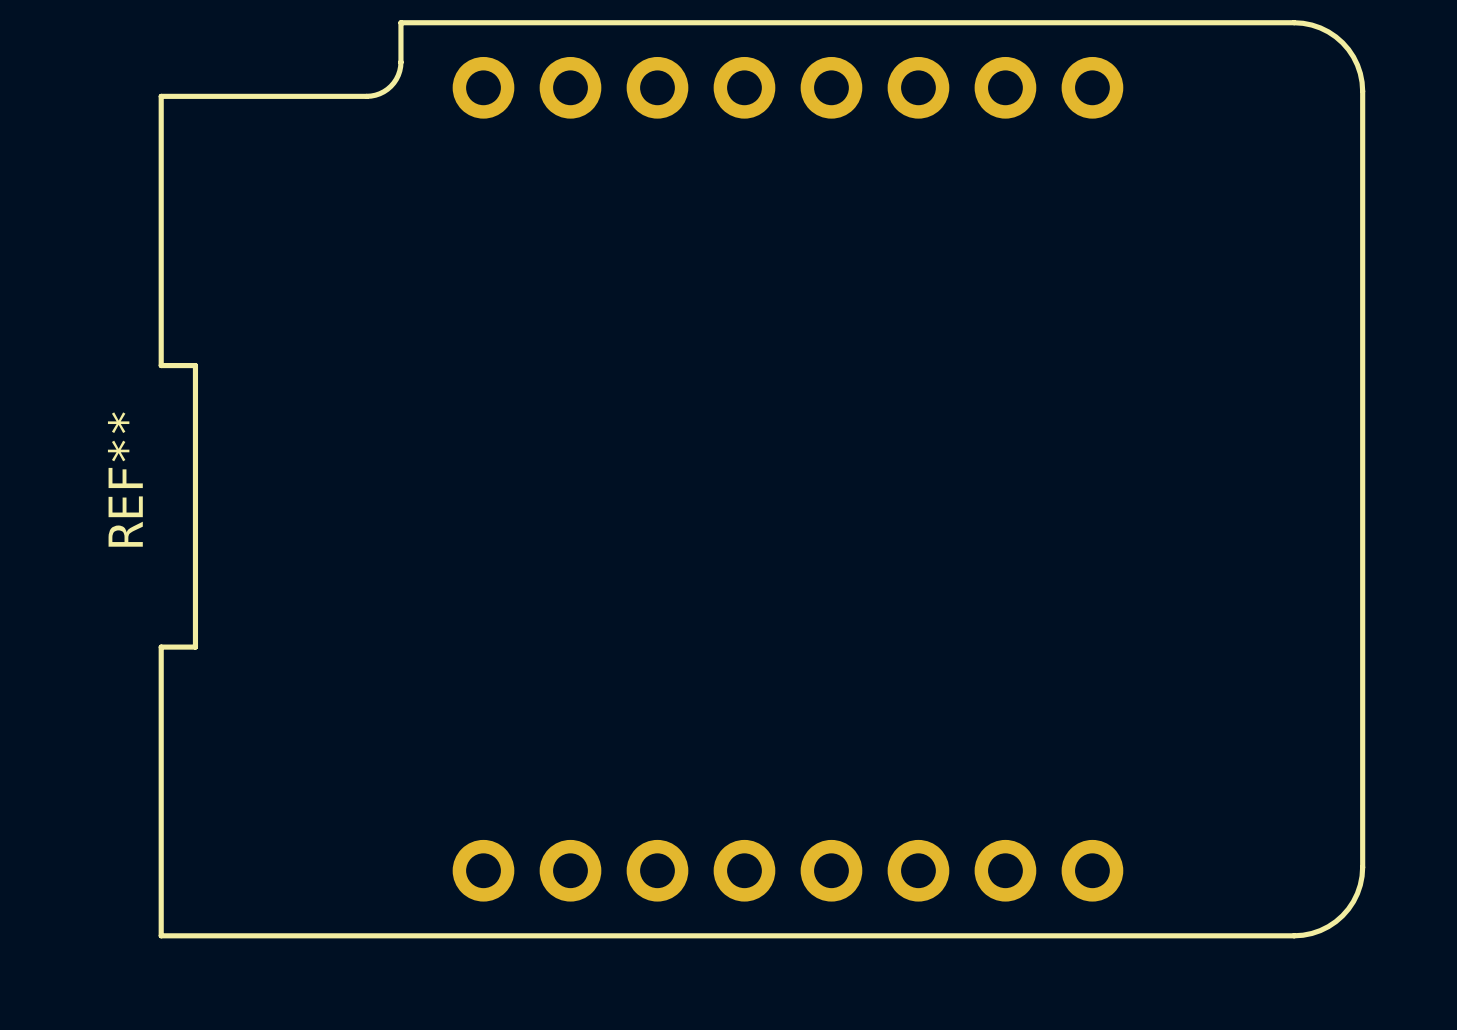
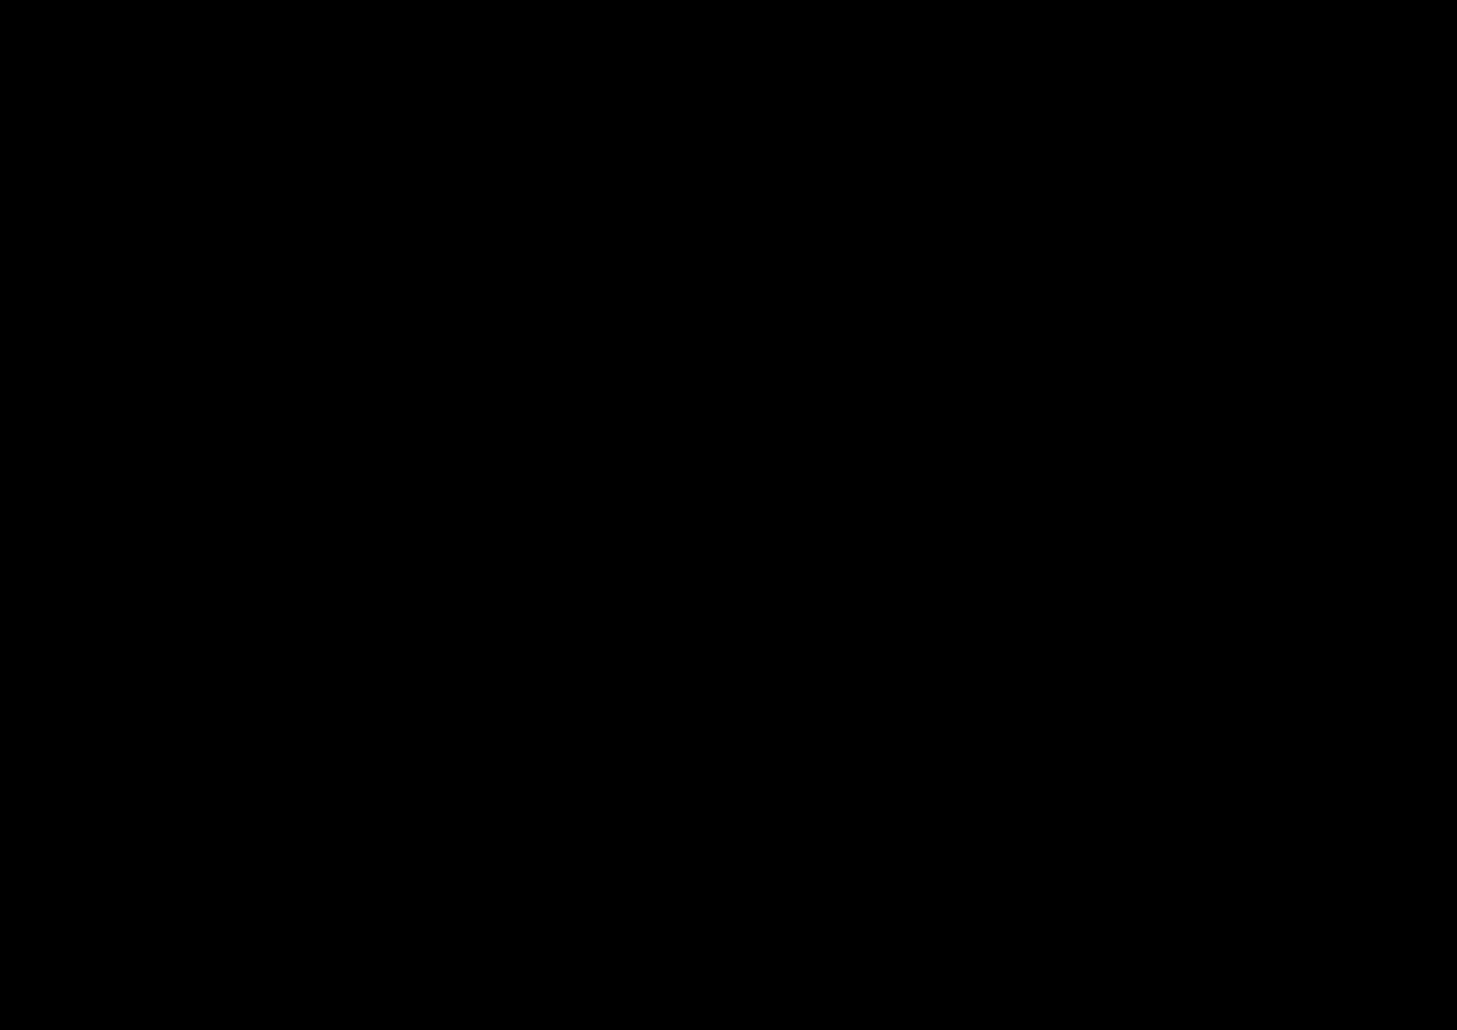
REF**: (761, 479) -> none

